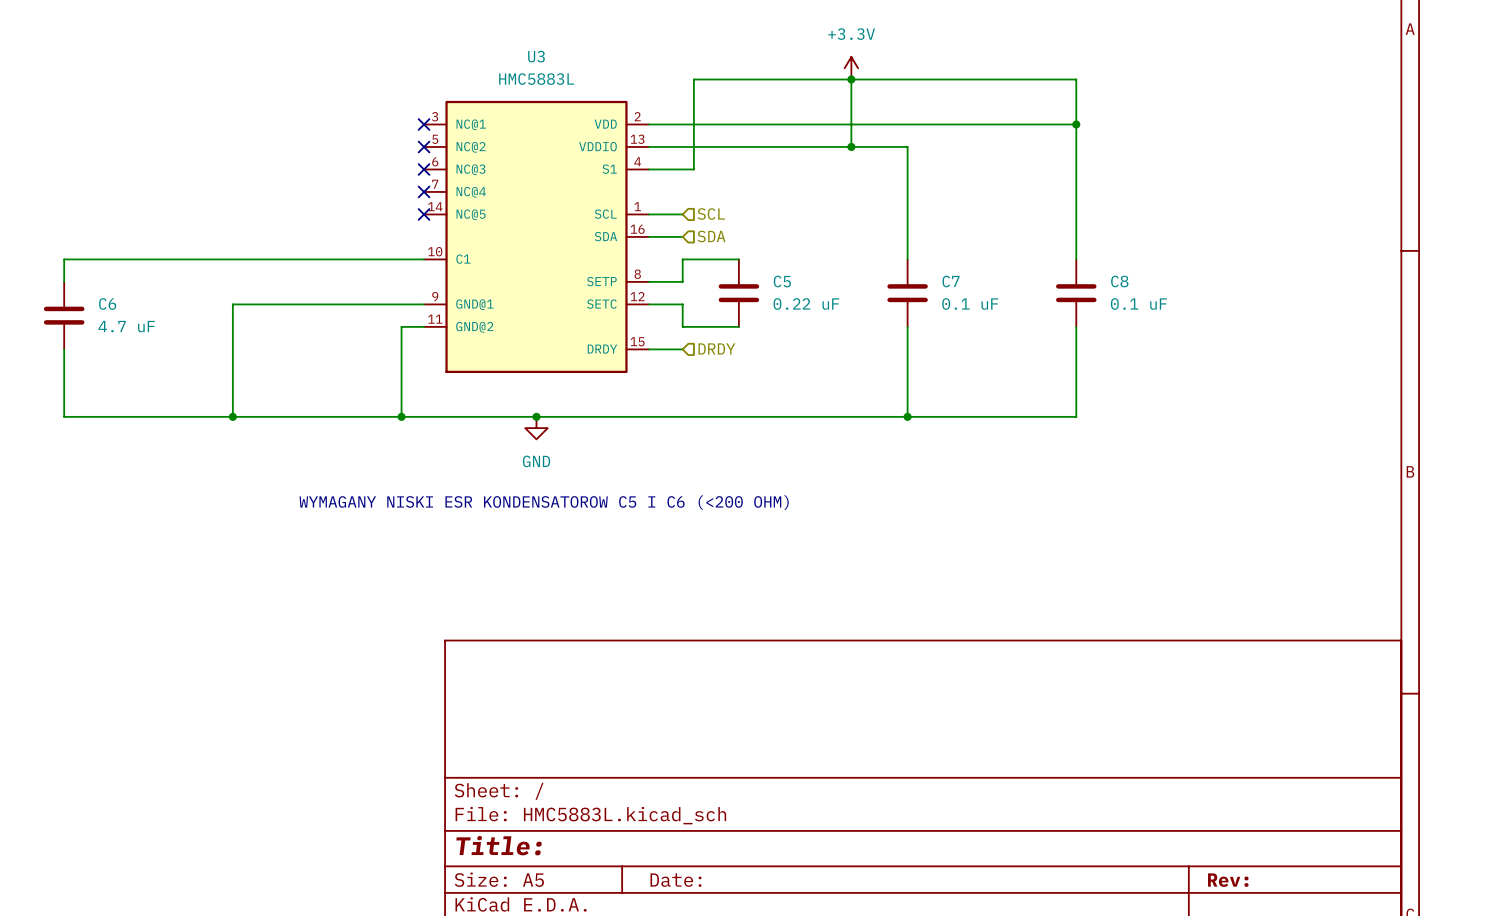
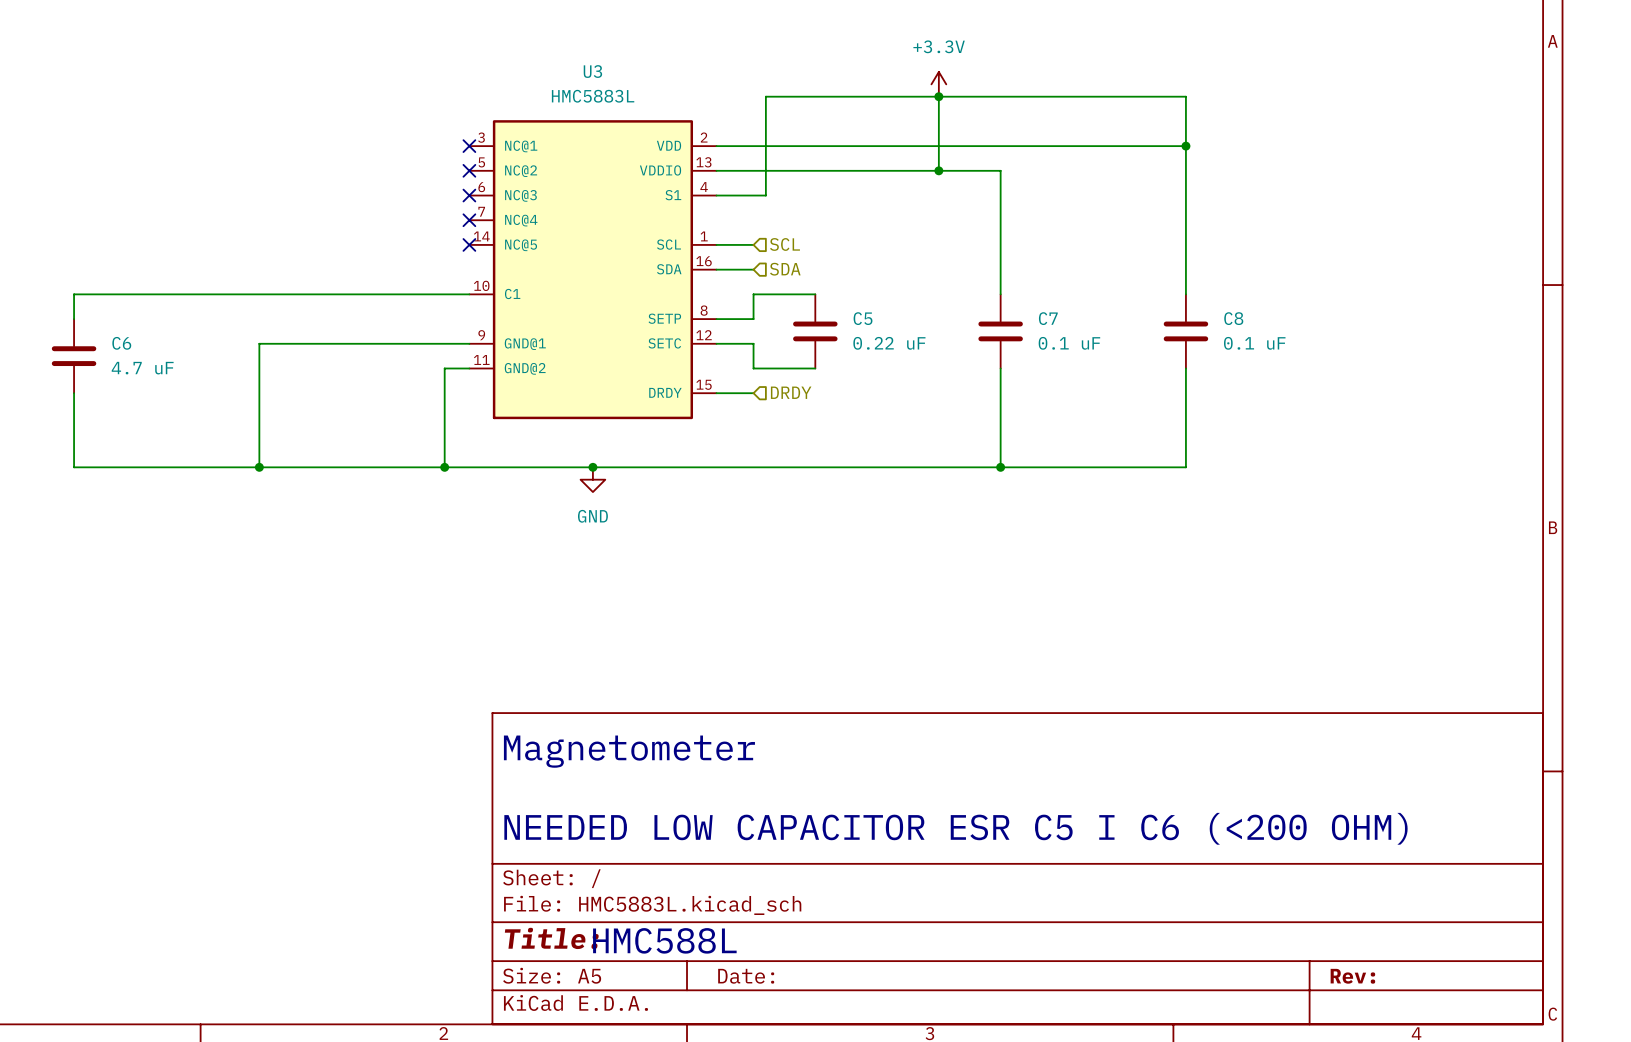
text: WYMAGANY NISKI ESR KONDENSATOROW C5 I C6 (<200 OHM) (544, 502) -> none
text: none -> Magnetometer (629, 751)
text: none -> NEEDED LOW CAPACITOR ESR C5 I C6 (<200 OHM) (955, 828)
text: none -> HMC588L (664, 940)

